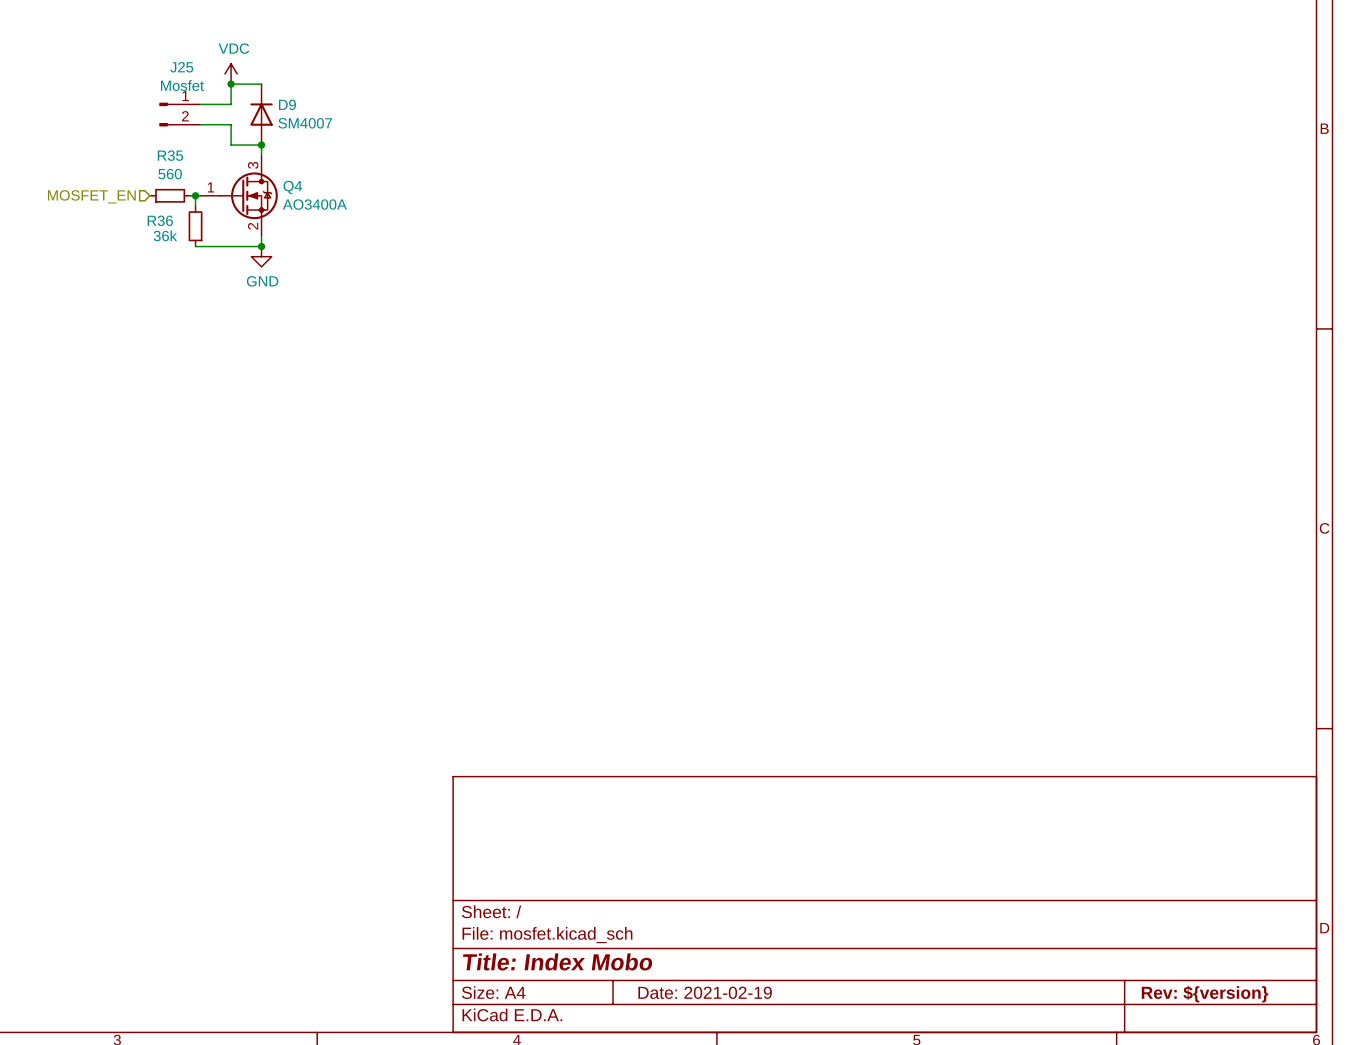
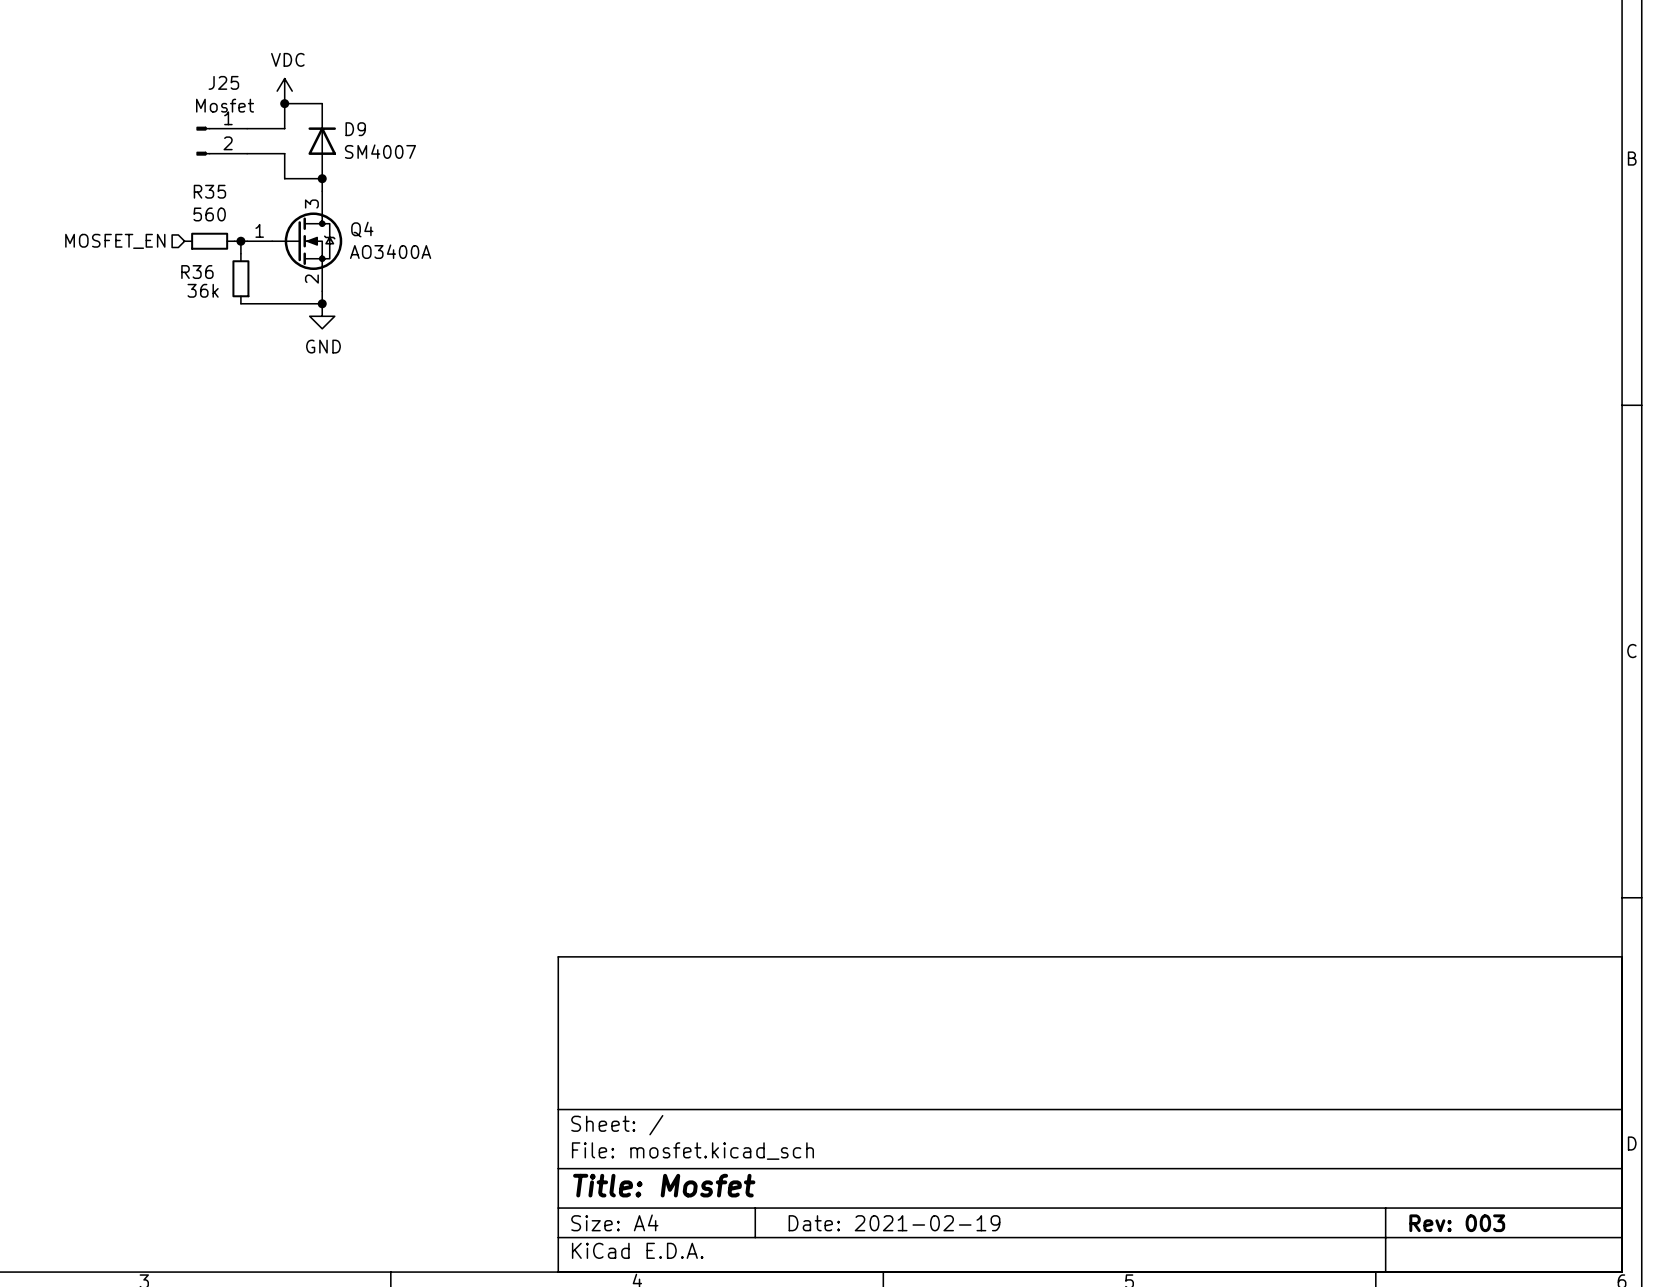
title block: Title: Index Mobo (557, 961) -> Title: Mosfet (664, 1185)
title block: Rev: ${version} (1205, 994) -> Rev: 003 (1457, 1223)

